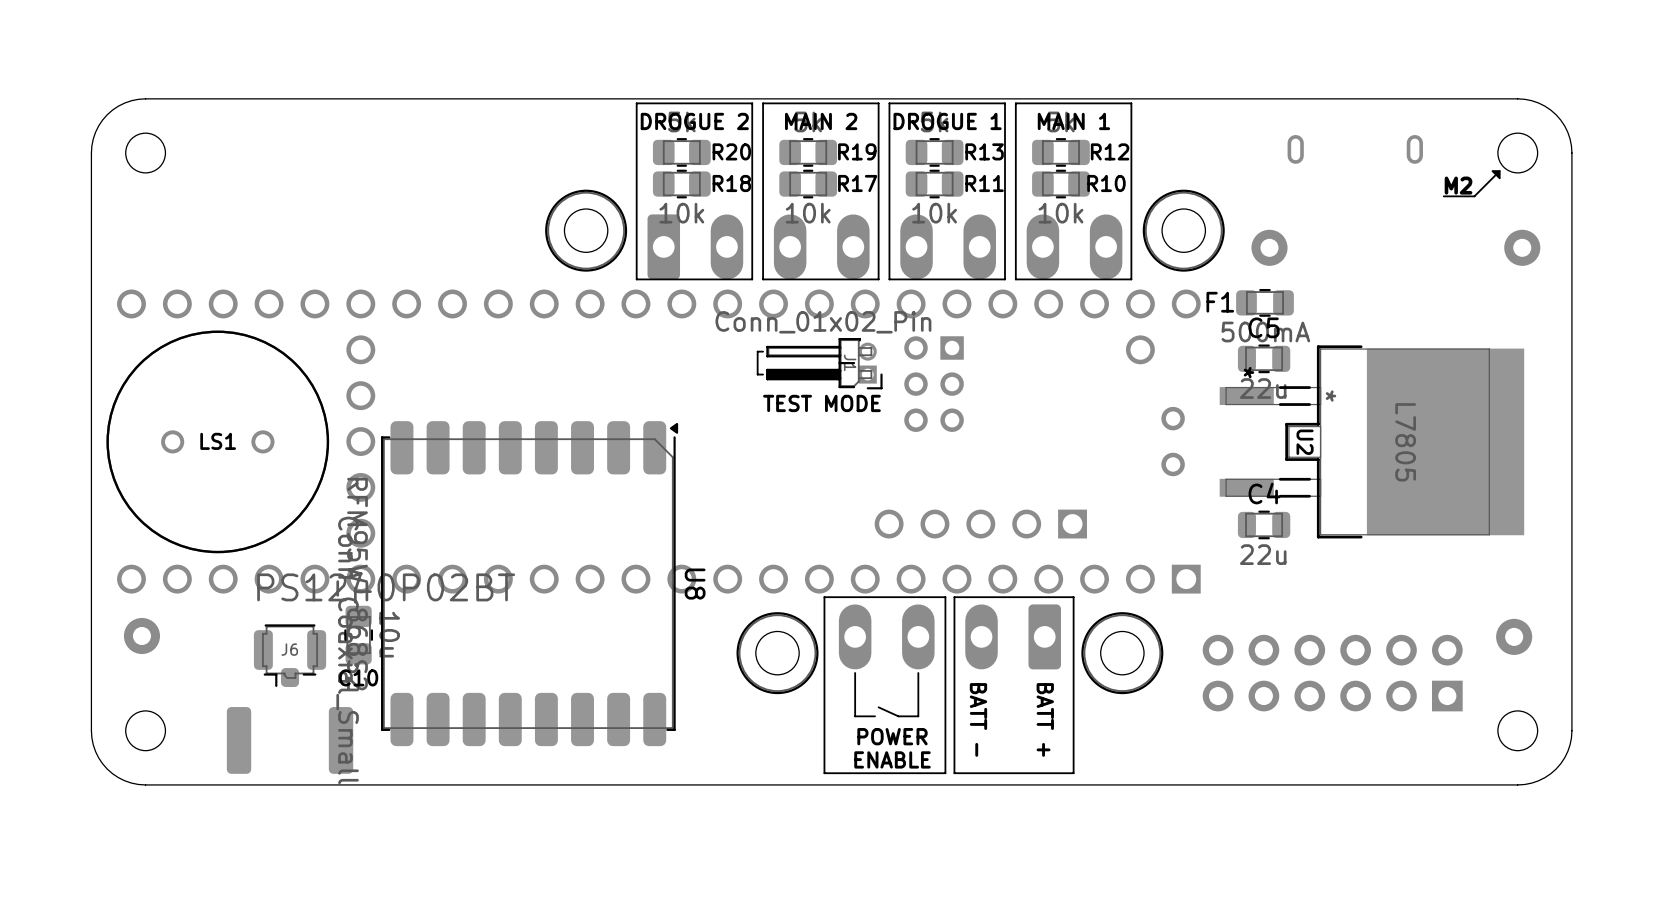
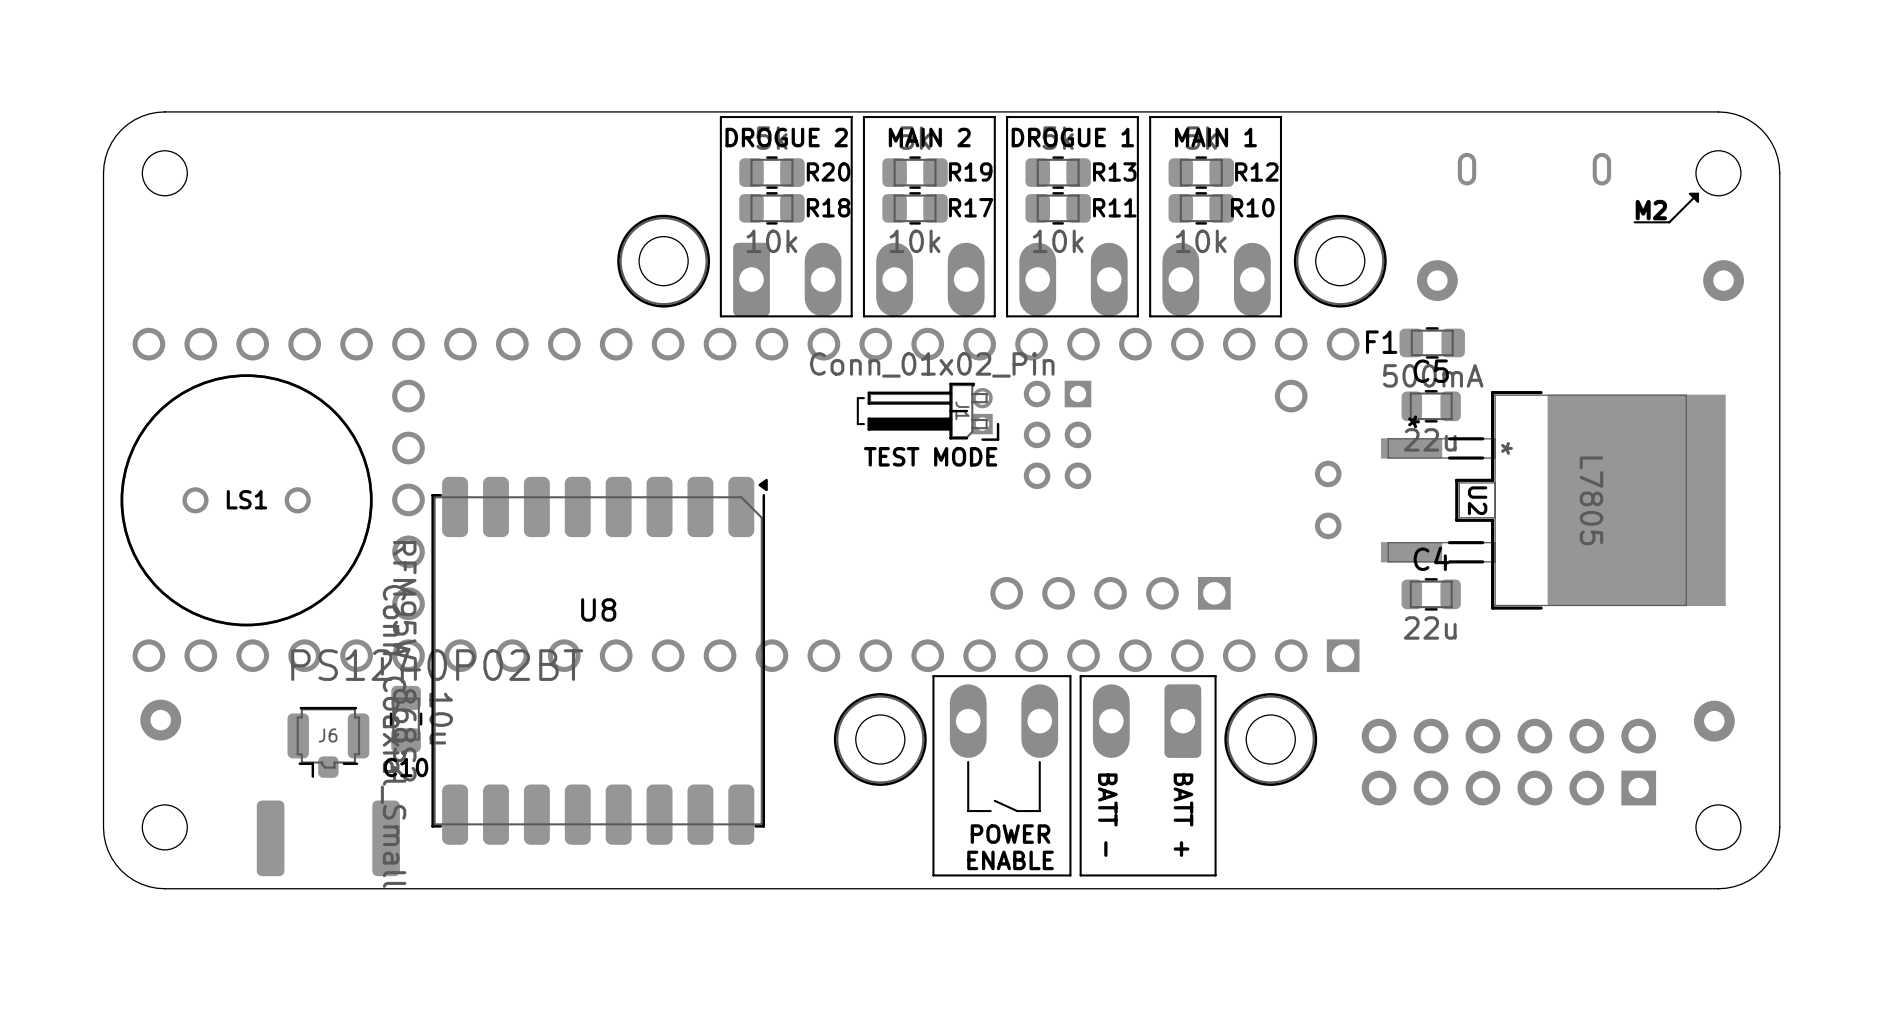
U8 name rotation: 0° (695, 584) -> 90° counterclockwise (598, 609)
U8 name position: U8 (695, 584) -> U8 (598, 609)

